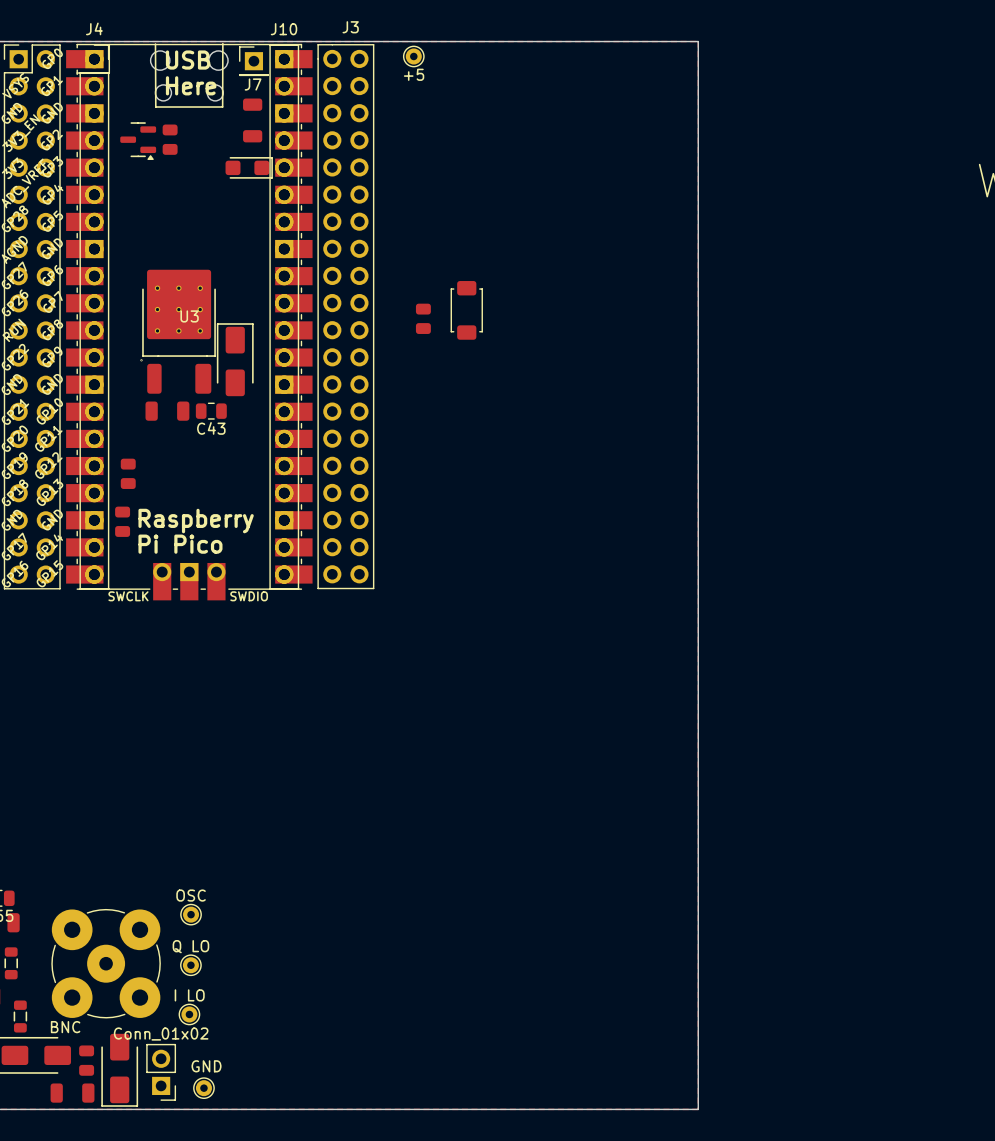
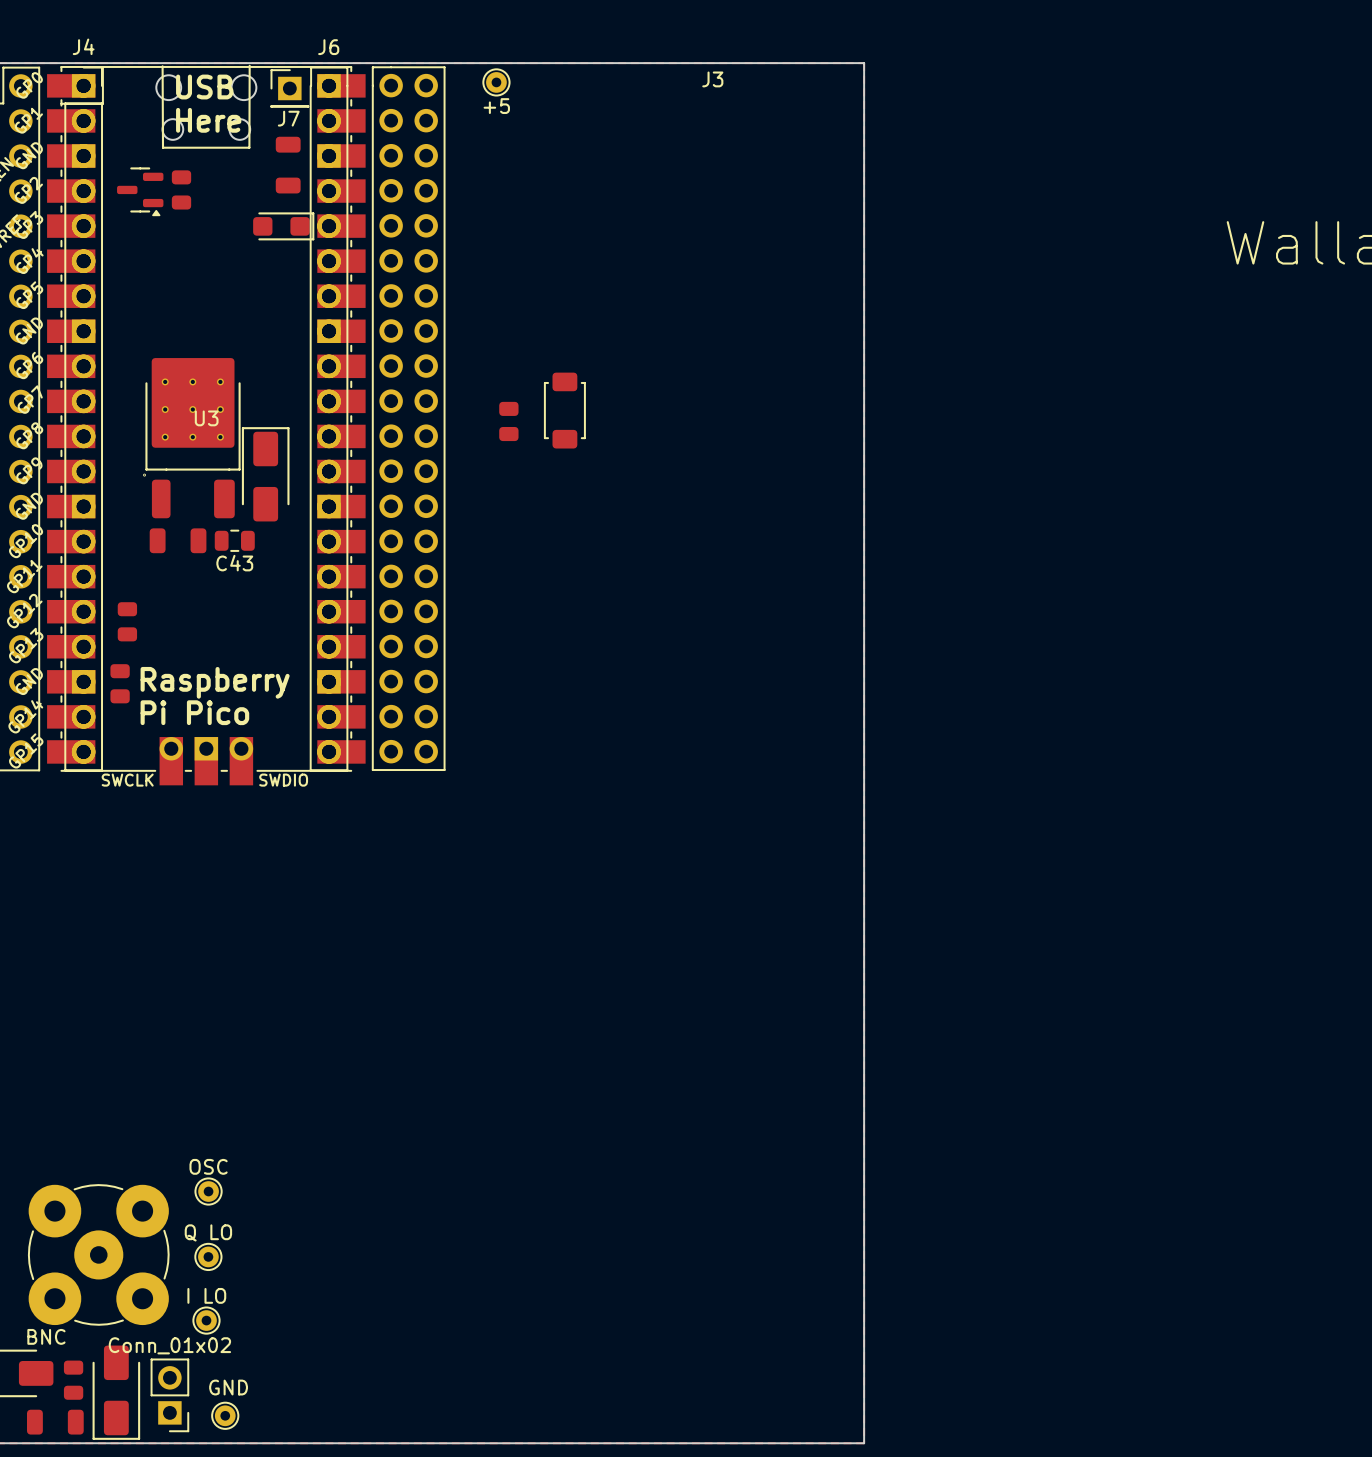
J3 name position: J3 (350, 27) -> J3 (712, 79)
J6: none -> (329, 418)
J10: (284, 317) -> none

